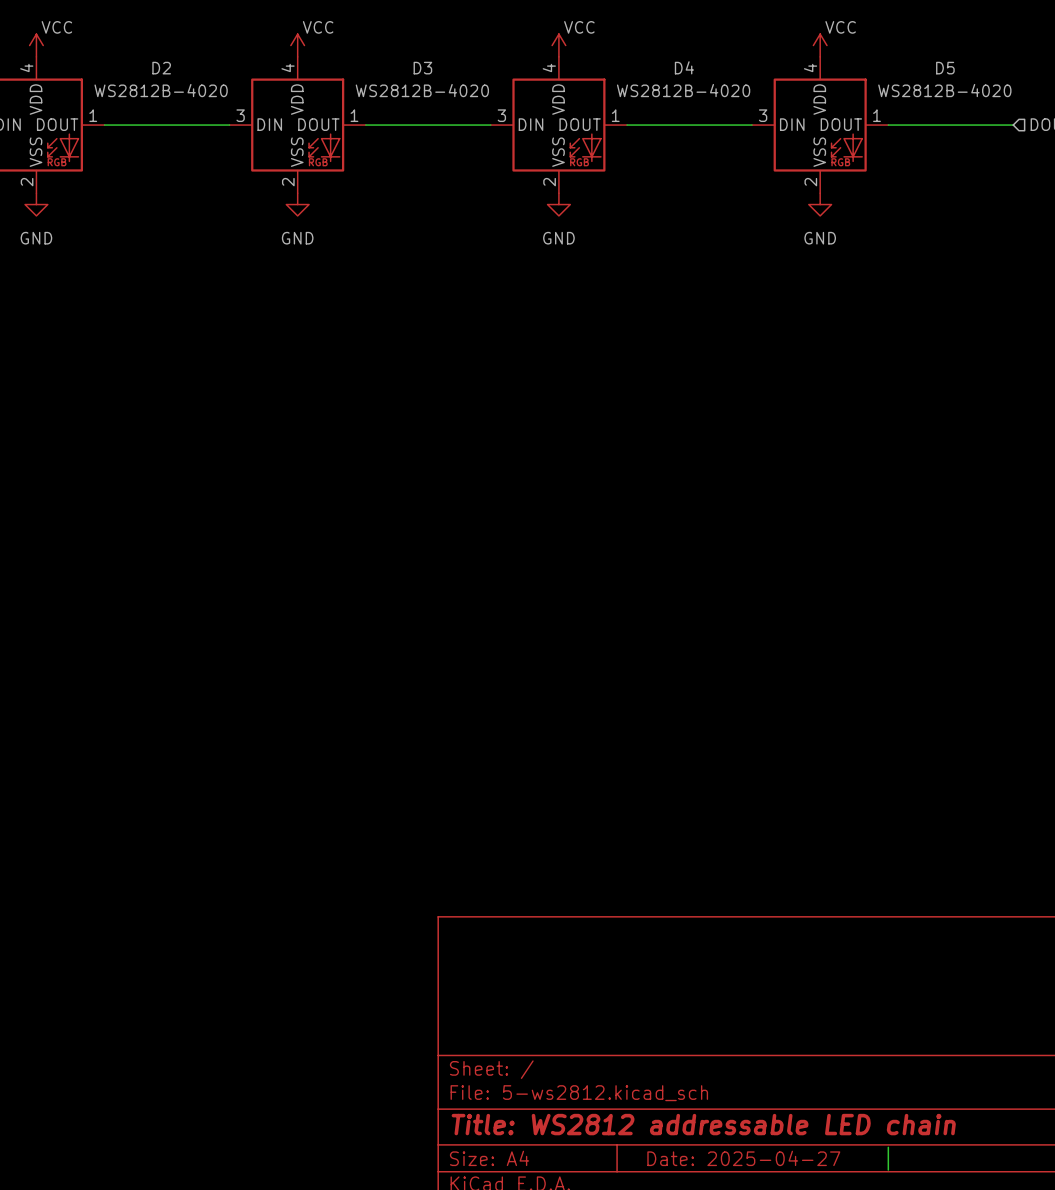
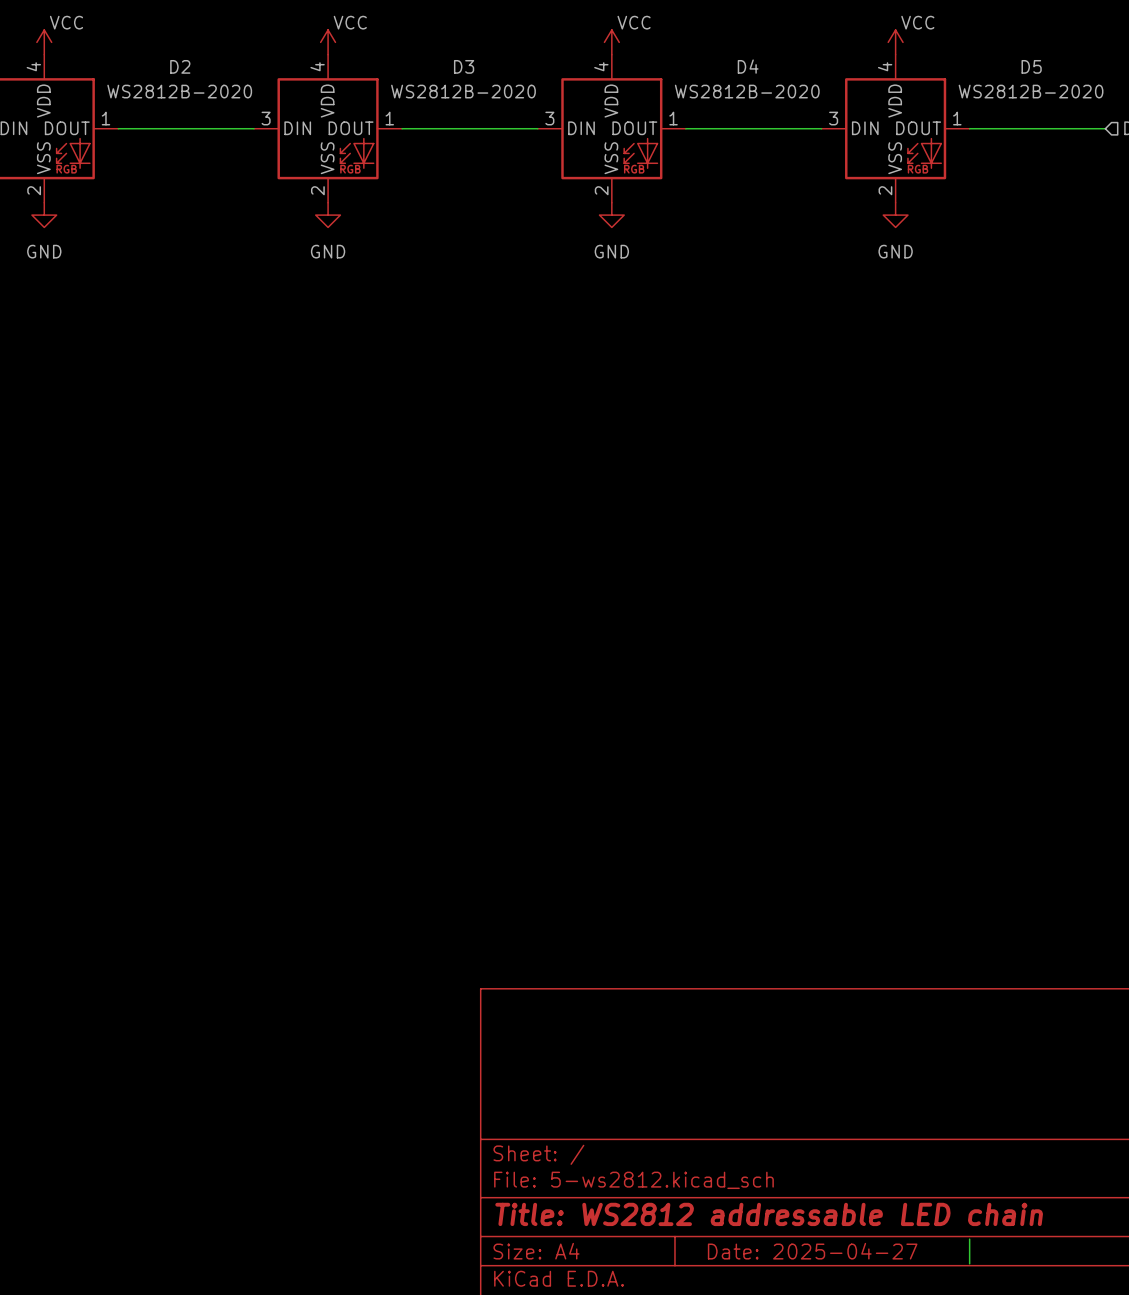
D2 value: WS2812B-4020 (161, 90) -> WS2812B-2020 (179, 91)
D3 value: WS2812B-4020 (422, 90) -> WS2812B-2020 (463, 91)
D4 value: WS2812B-4020 (683, 90) -> WS2812B-2020 (747, 91)
D5 value: WS2812B-4020 (944, 90) -> WS2812B-2020 (1031, 91)

